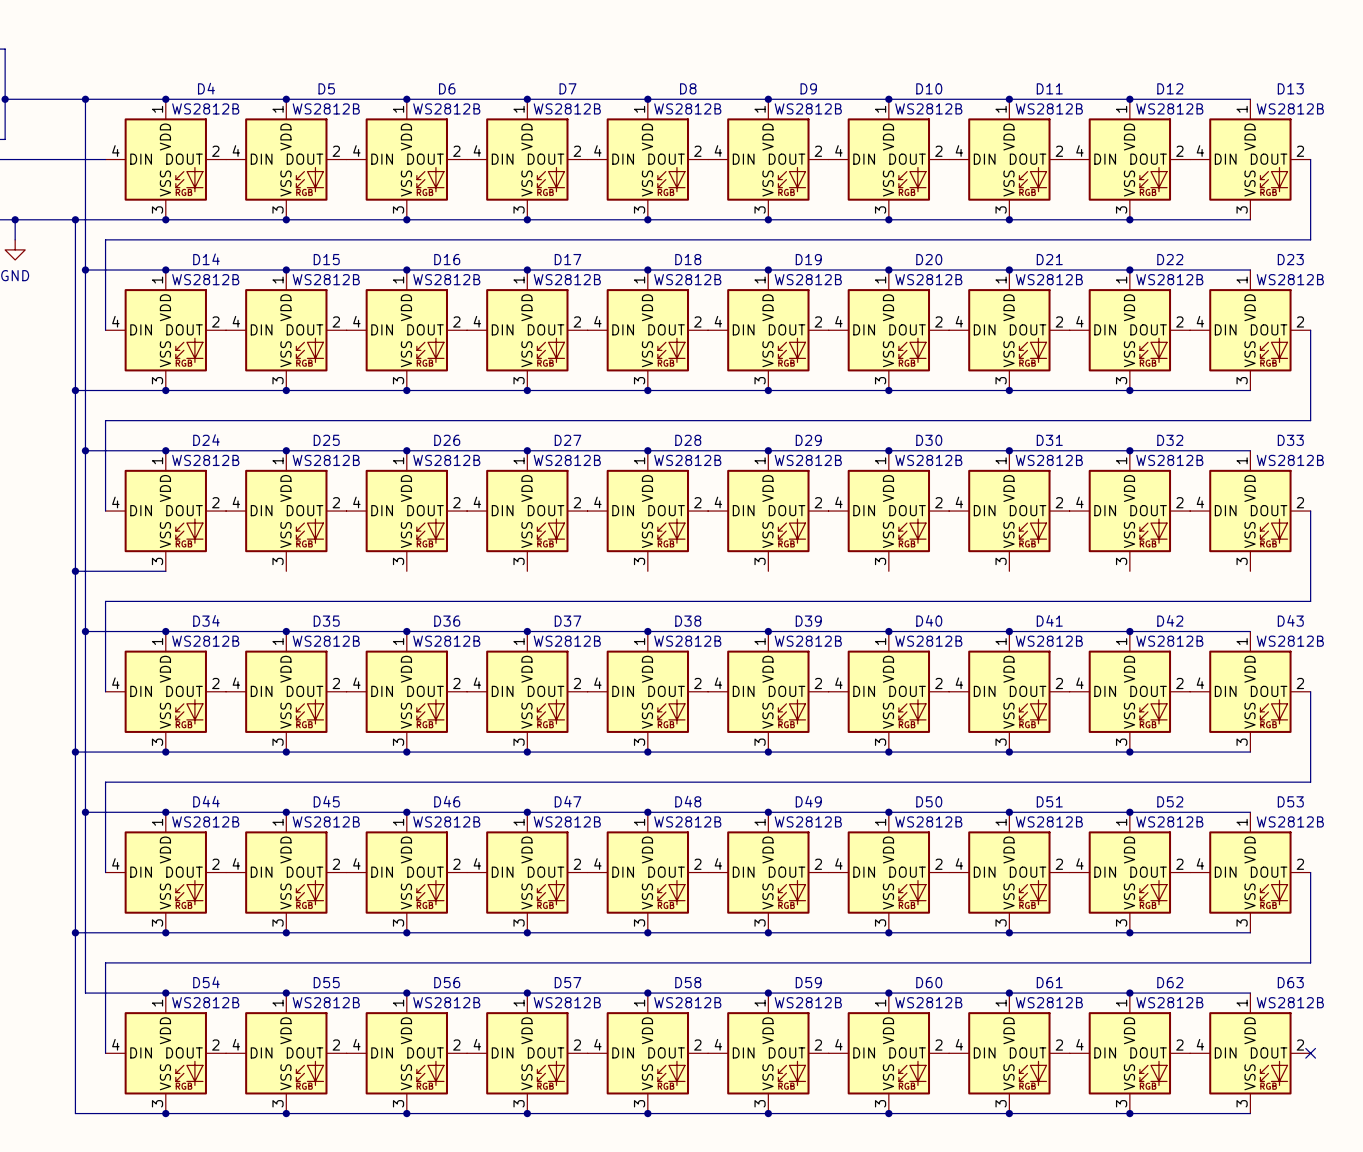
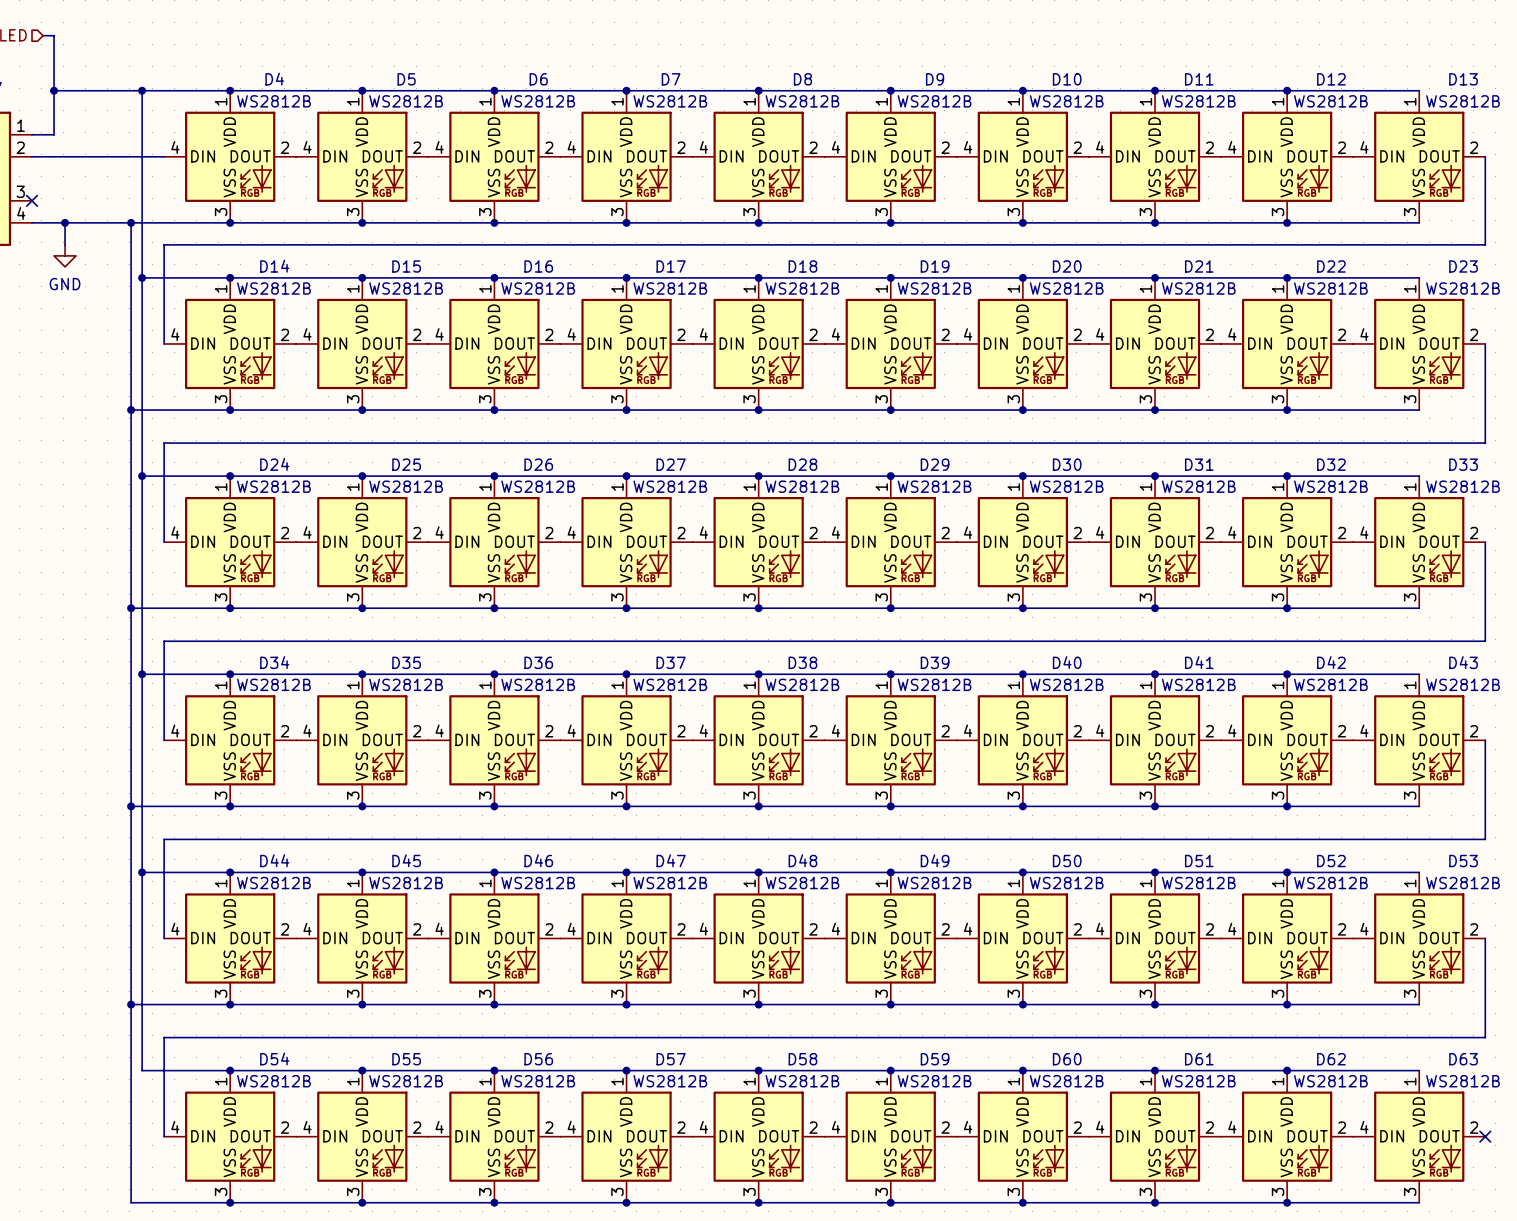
wire: none -> (230, 608) (1419, 608)
junction: none -> (230, 608)
junction: none -> (362, 608)
junction: none -> (494, 608)
junction: none -> (626, 608)
junction: none -> (758, 608)
junction: none -> (890, 608)
junction: none -> (1022, 608)
junction: none -> (1155, 608)
junction: none -> (1287, 608)

